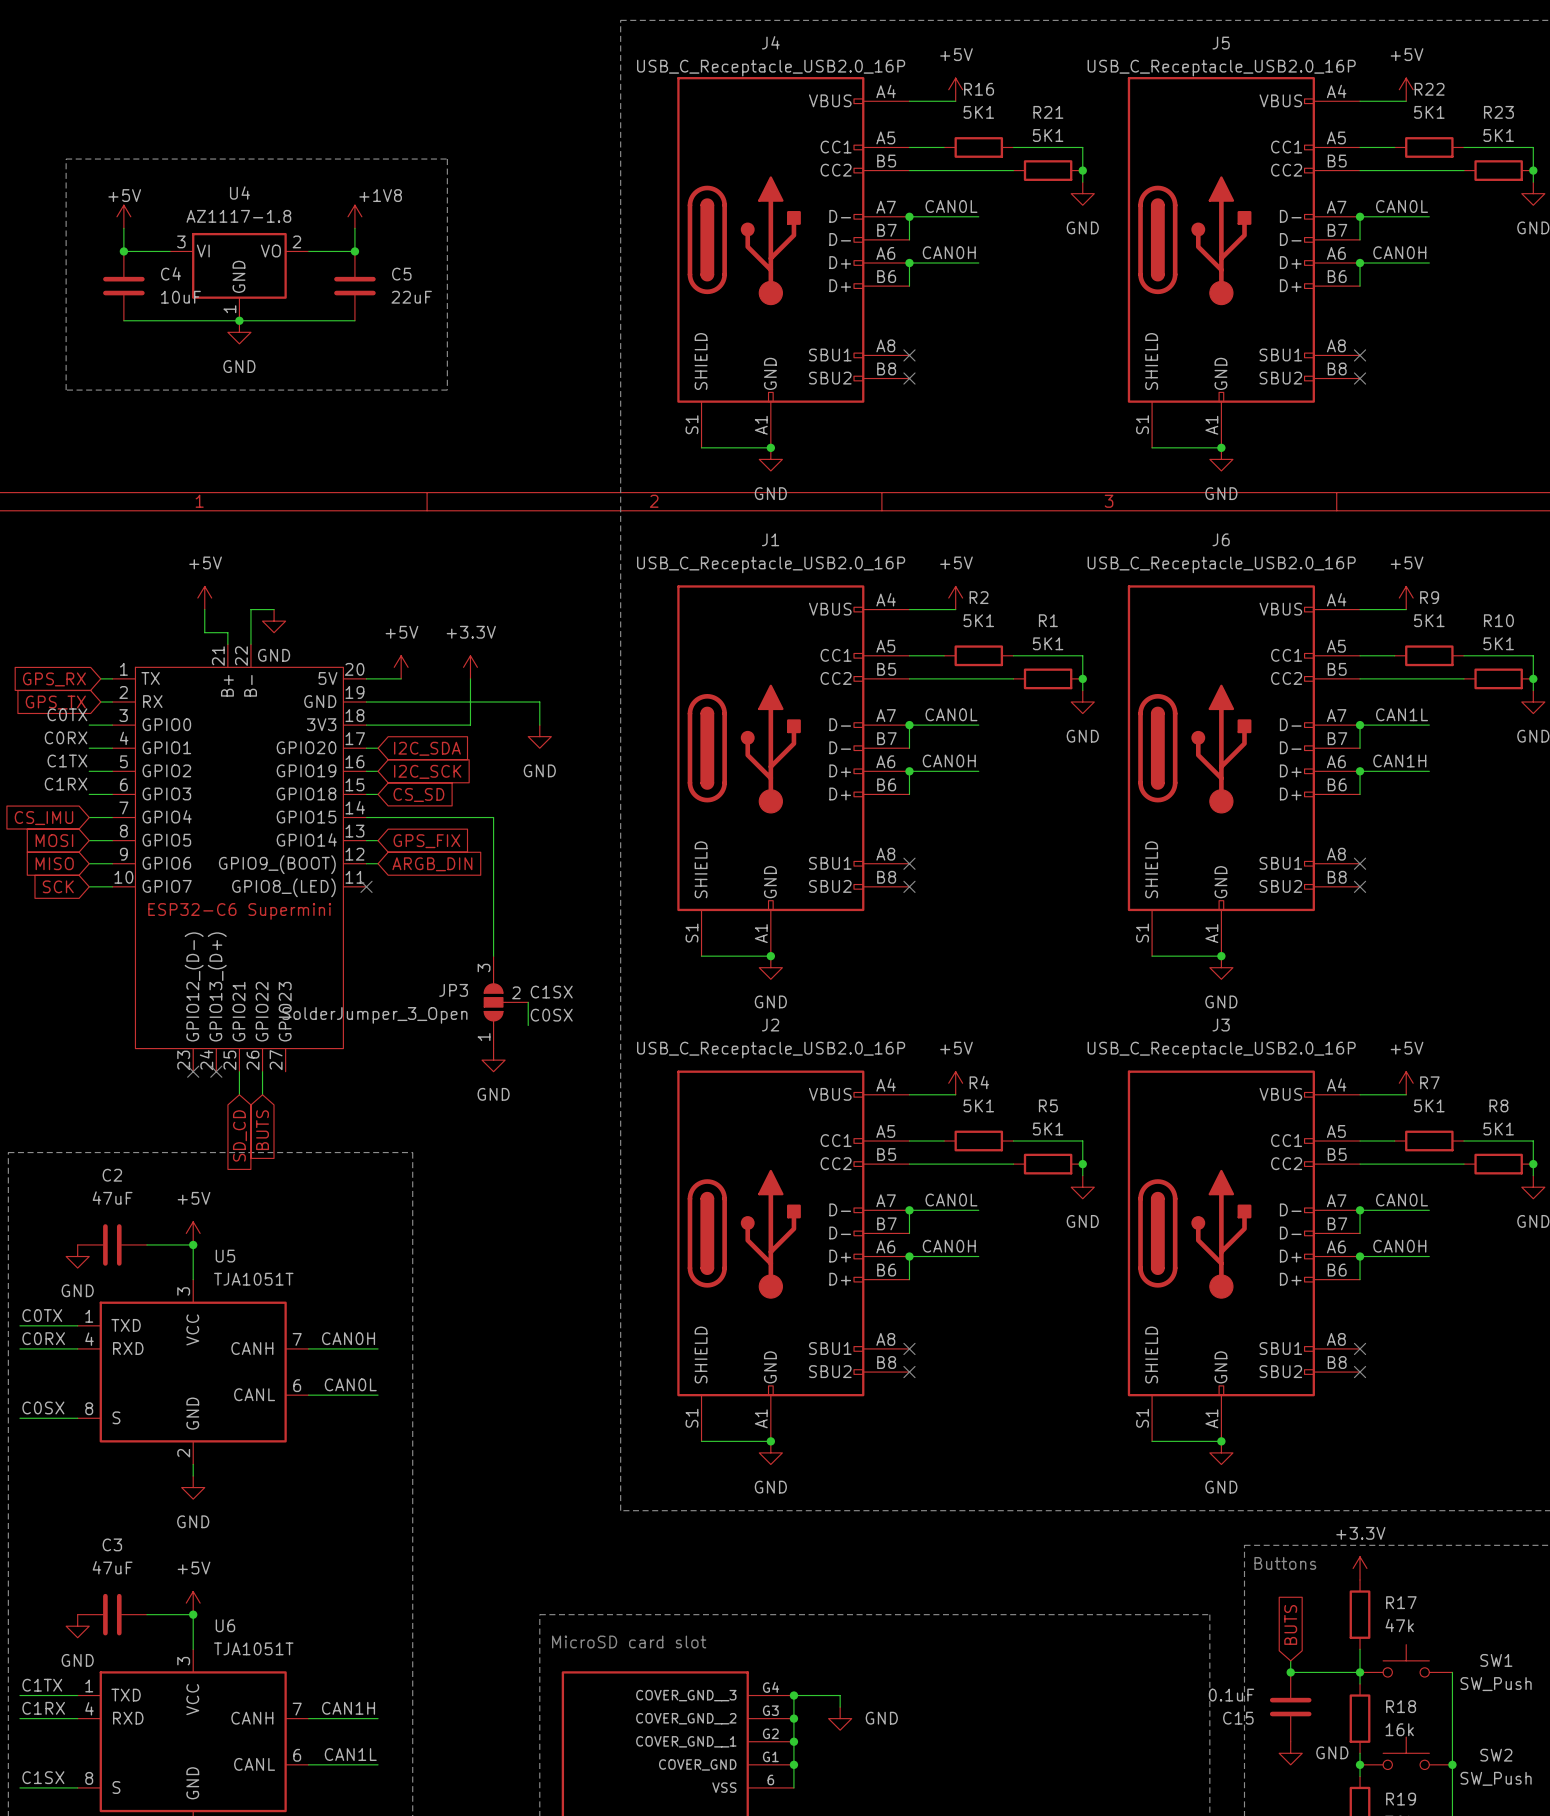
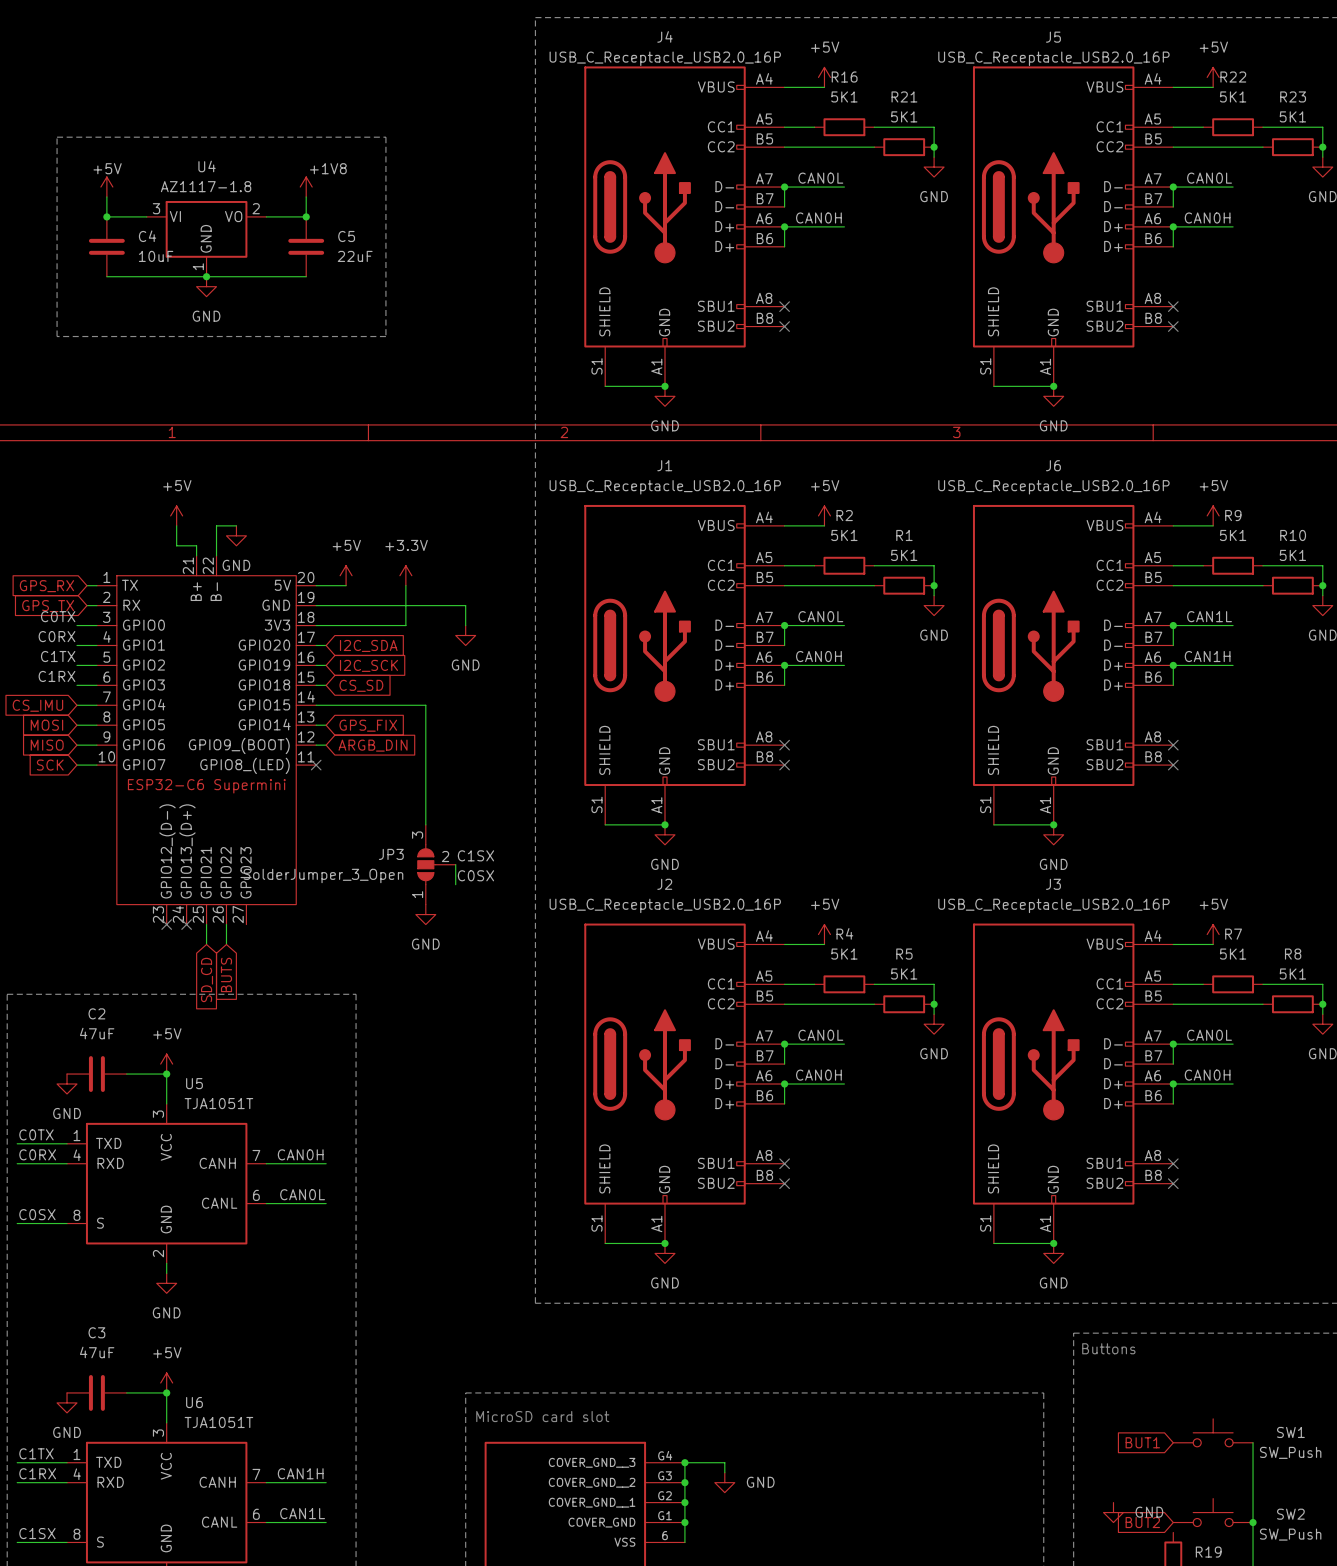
power symbol: +3.3V (1360, 1568) -> none
R17: 47k (1360, 1614) -> none
global label: BUTS (1290, 1624) -> BUT1 (1142, 1442)
wire: (1360, 1649) (1360, 1683) -> none
wire: (1290, 1660) (1290, 1672) (1360, 1672) -> none
junction: (1290, 1672) -> none
junction: (1360, 1672) -> none
C15: 0.1uF (1290, 1707) -> none
R18: 16k (1360, 1718) -> none
wire: (1360, 1753) (1360, 1776) -> none
global label: none -> BUT2 (1142, 1522)
junction: (1360, 1764) -> none

